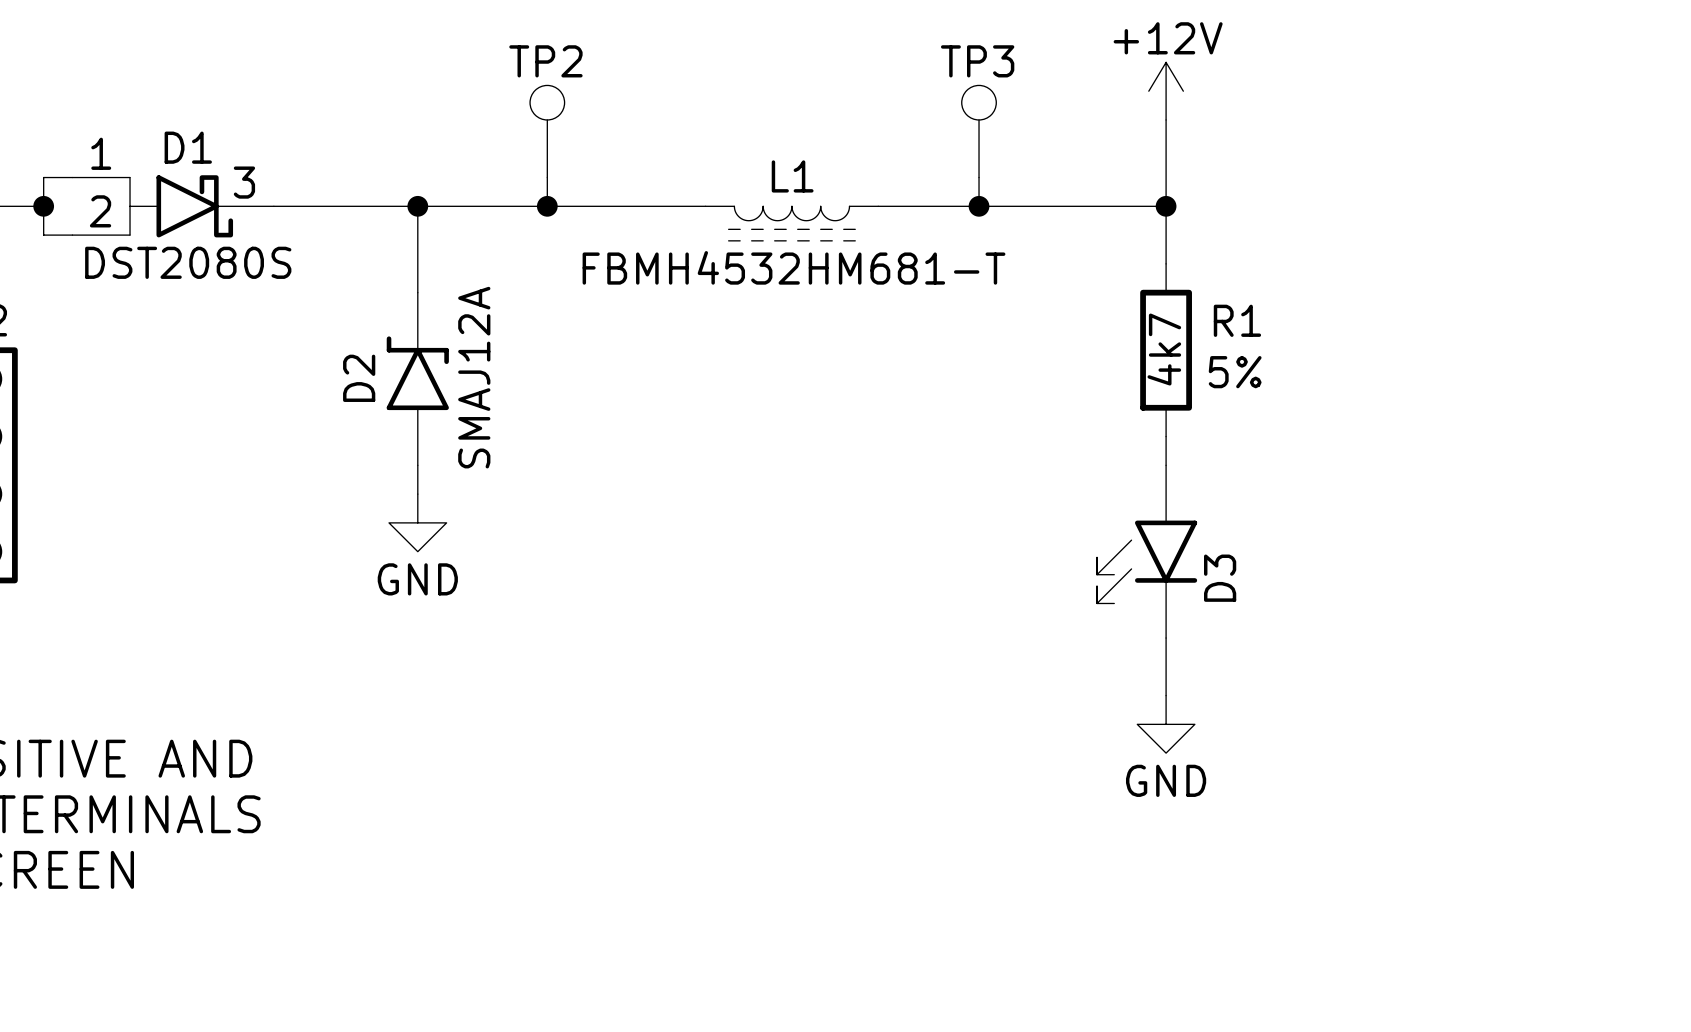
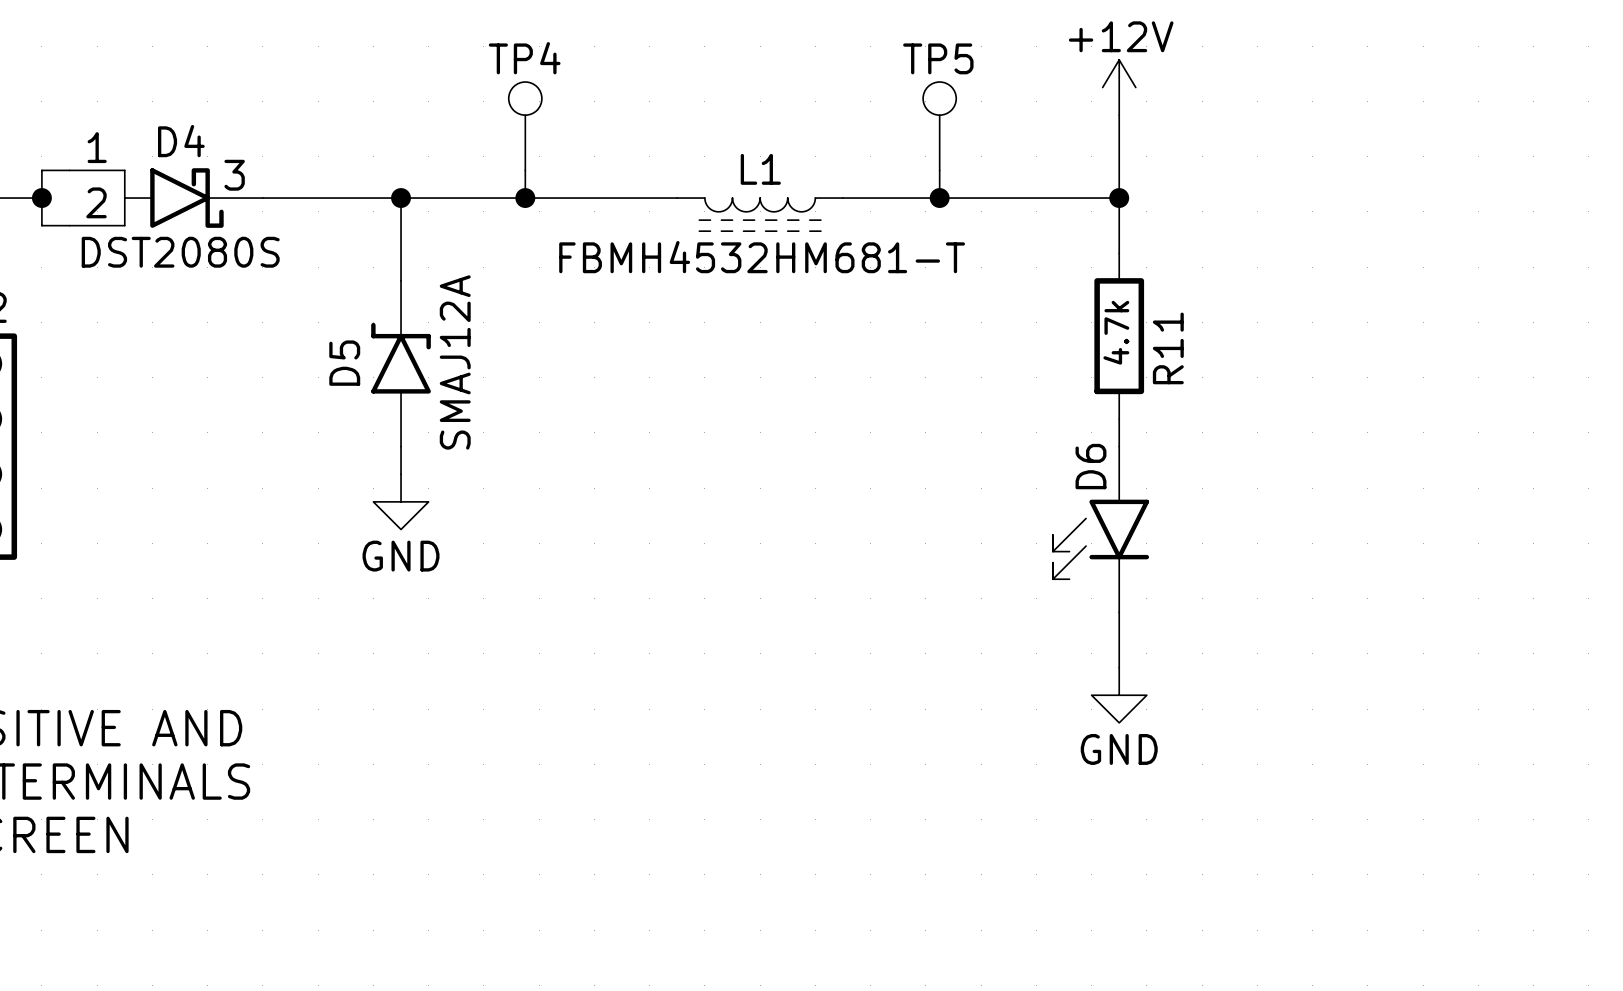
TP2 name: TP2 (545, 61) -> TP4 (524, 58)
TP3 name: TP3 (977, 61) -> TP5 (938, 58)
D1 name: D1 (188, 147) -> D4 (181, 141)
R1 name: R1 (1237, 320) -> R11 (1168, 348)
R1 text: none -> 4.7k (1116, 332)
R1 text: 4k7 (1164, 349) -> none
R1 text: 5% (1235, 372) -> none
D2 name: D2 (359, 378) -> D5 (344, 363)
D3 name: D3 (1220, 578) -> D6 (1090, 466)

